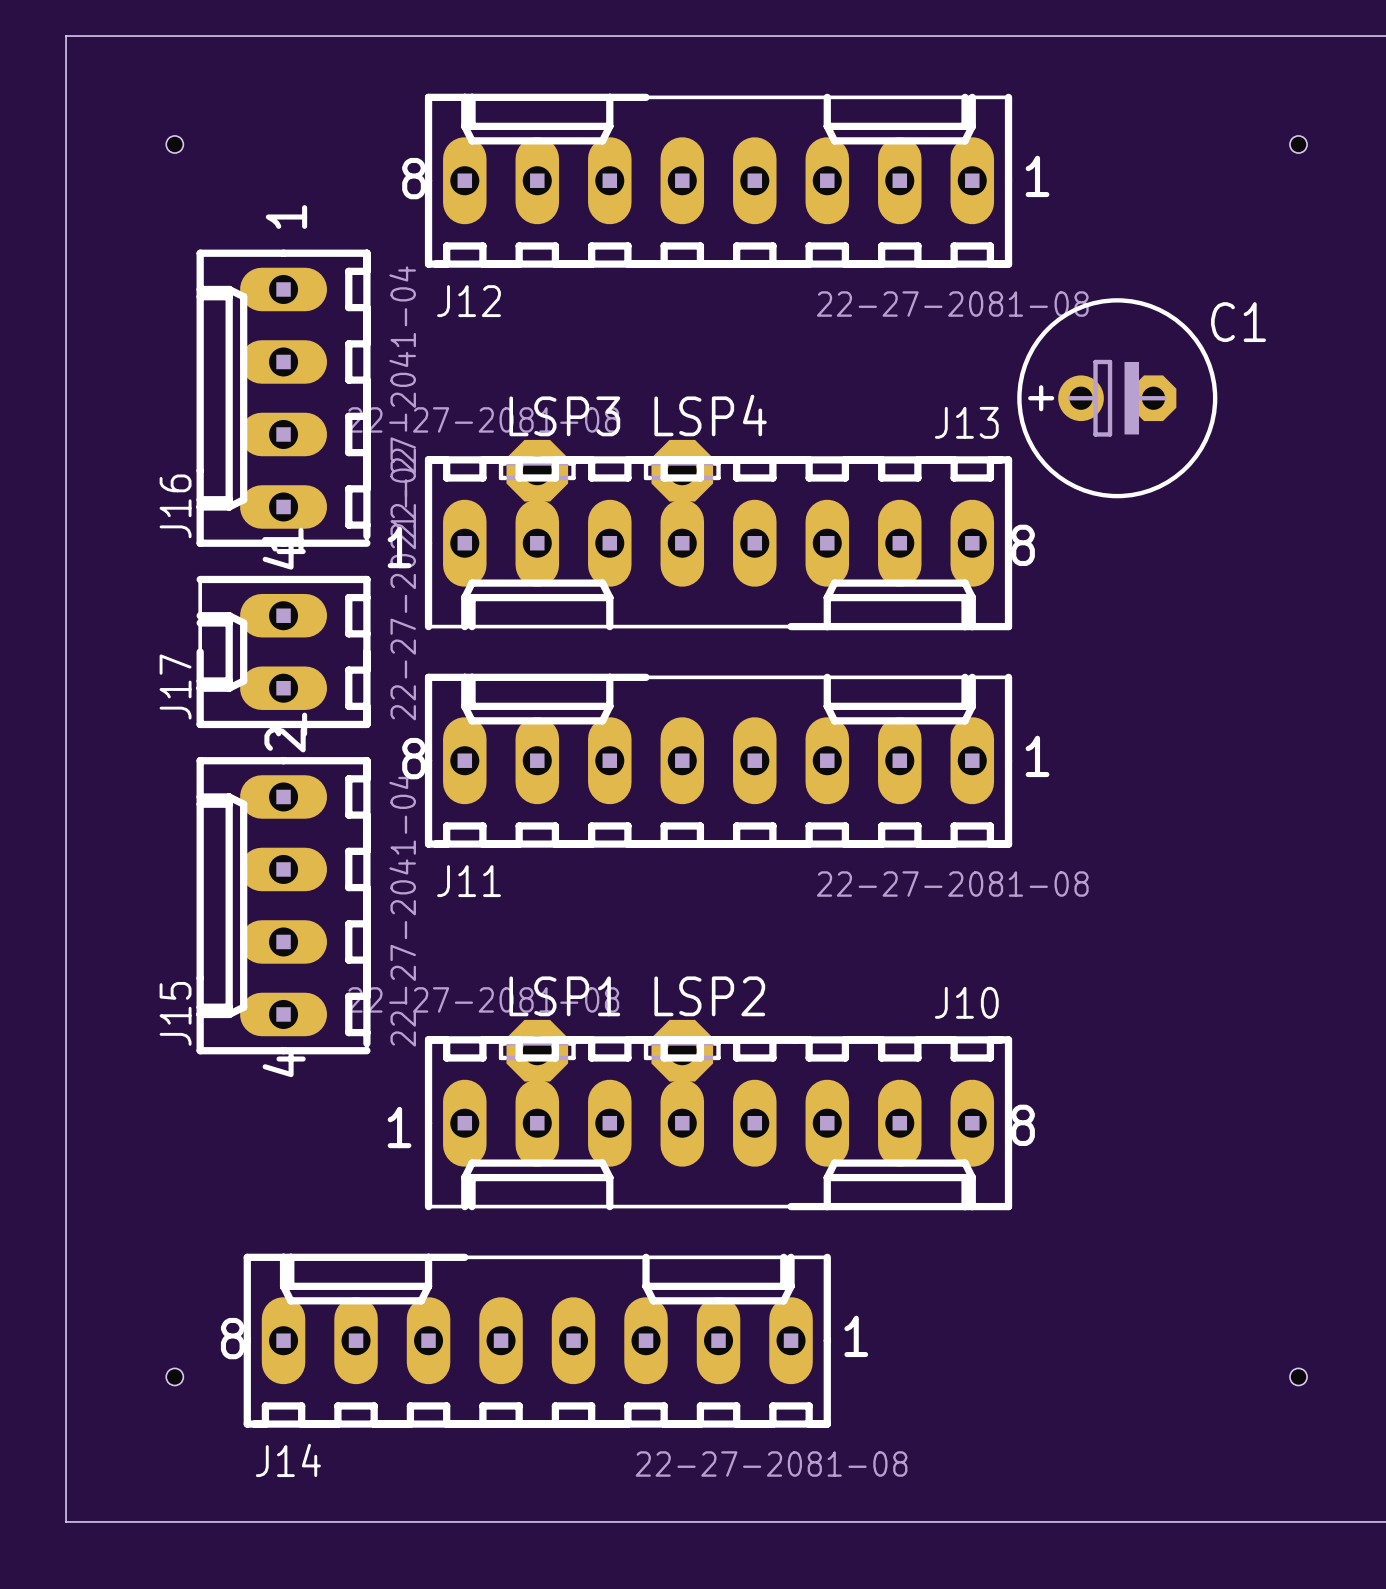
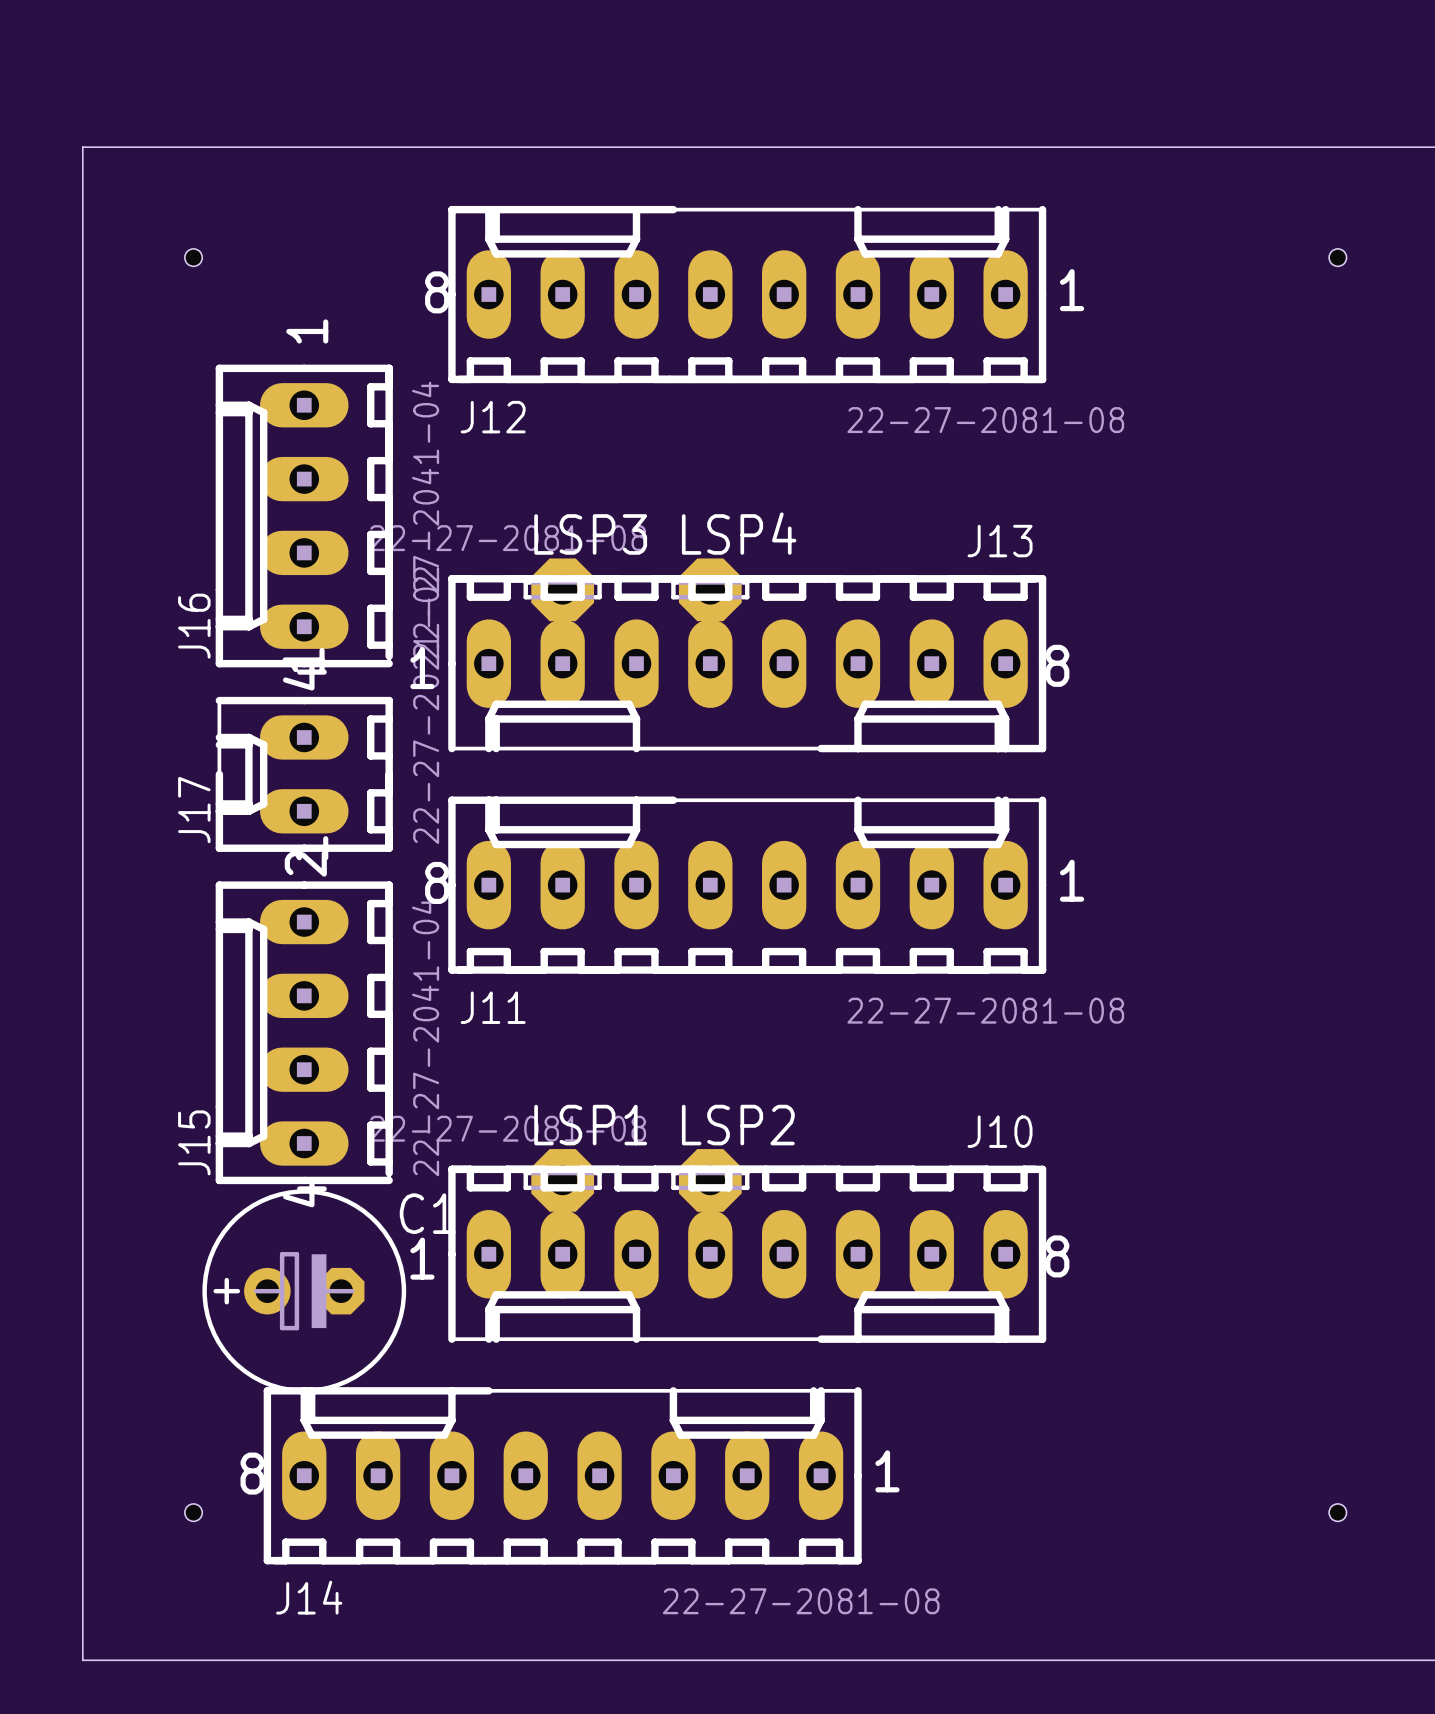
C1 position: (1117, 398) -> (304, 1291)

